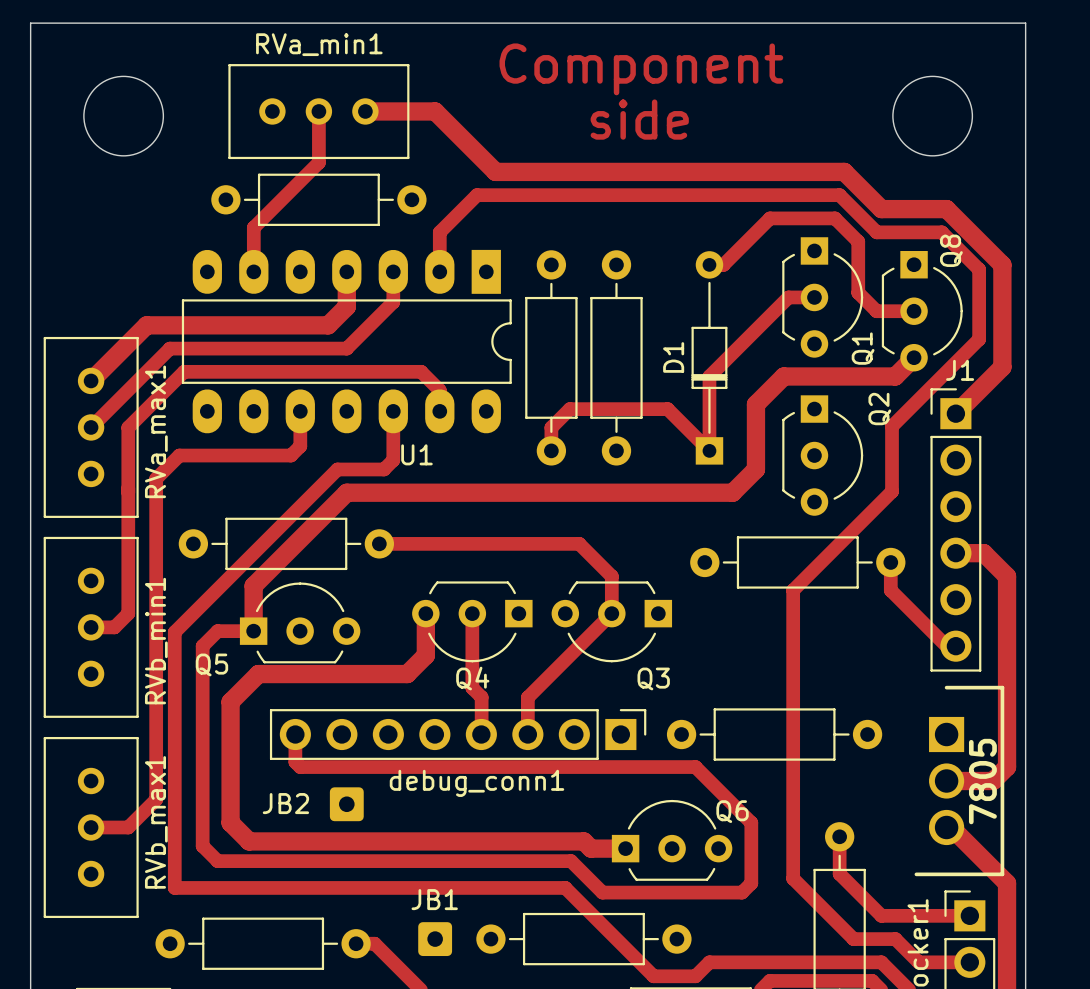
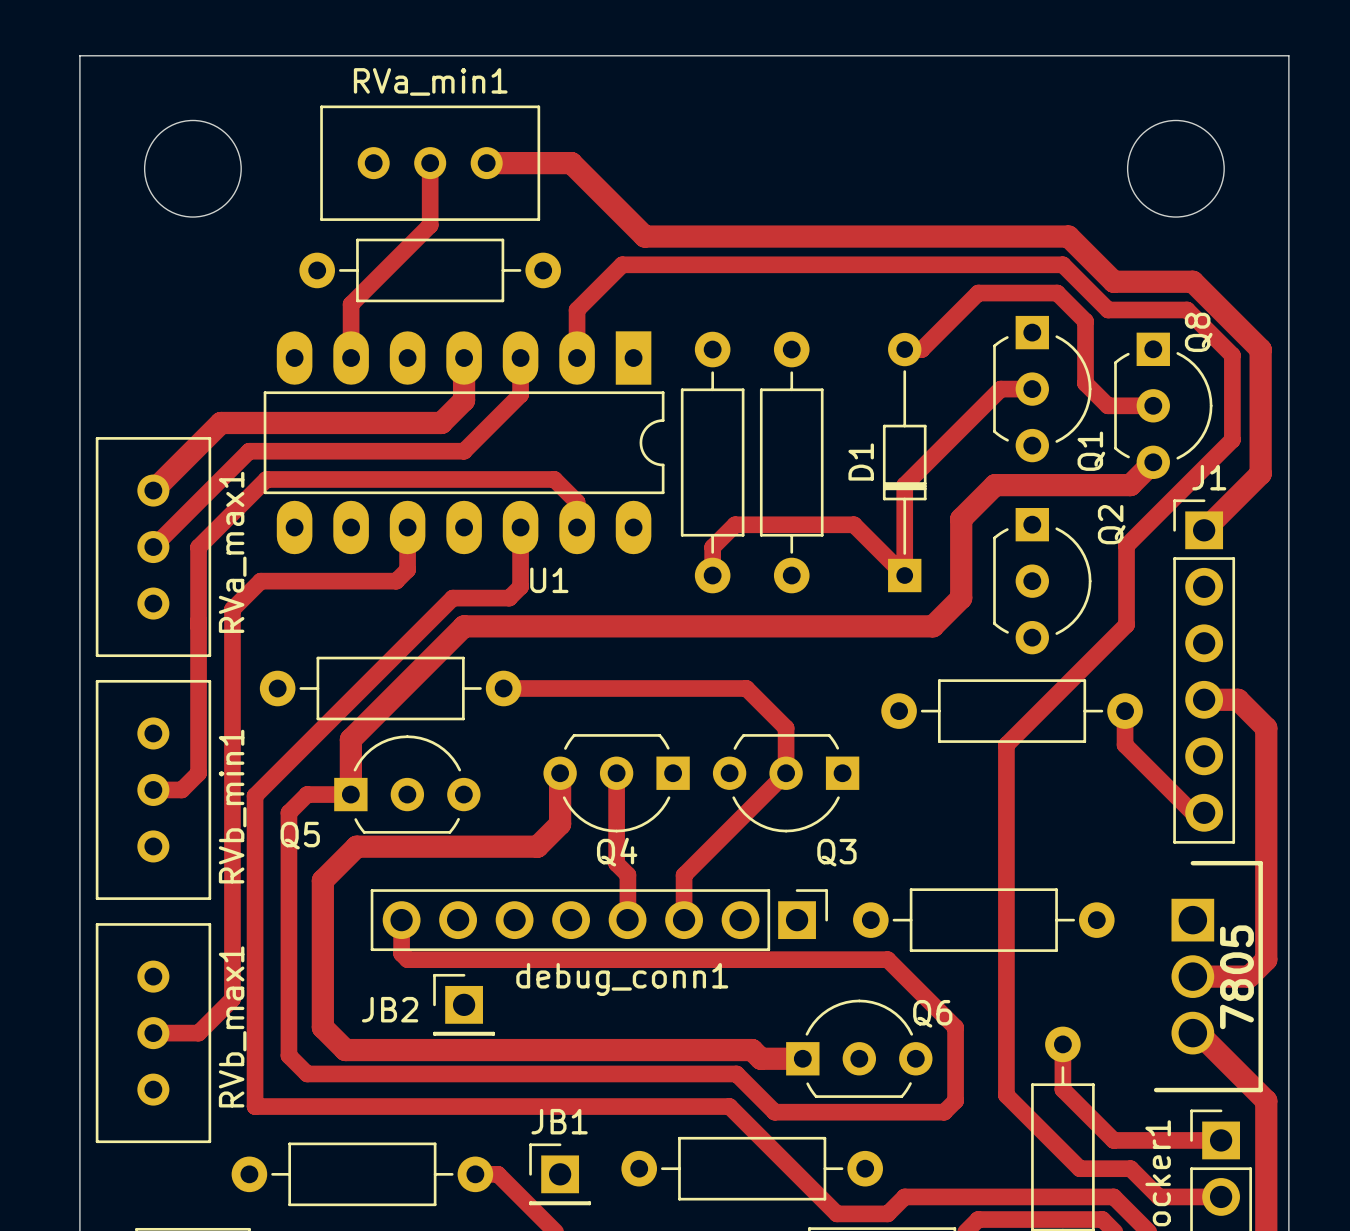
text: Component (641, 69) -> none
text: side (639, 119) -> none
JB2 footprint: [329, 787, 364, 822] -> [433, 973, 495, 1036]
JB1 footprint: [418, 922, 453, 957] -> [529, 1143, 592, 1206]

